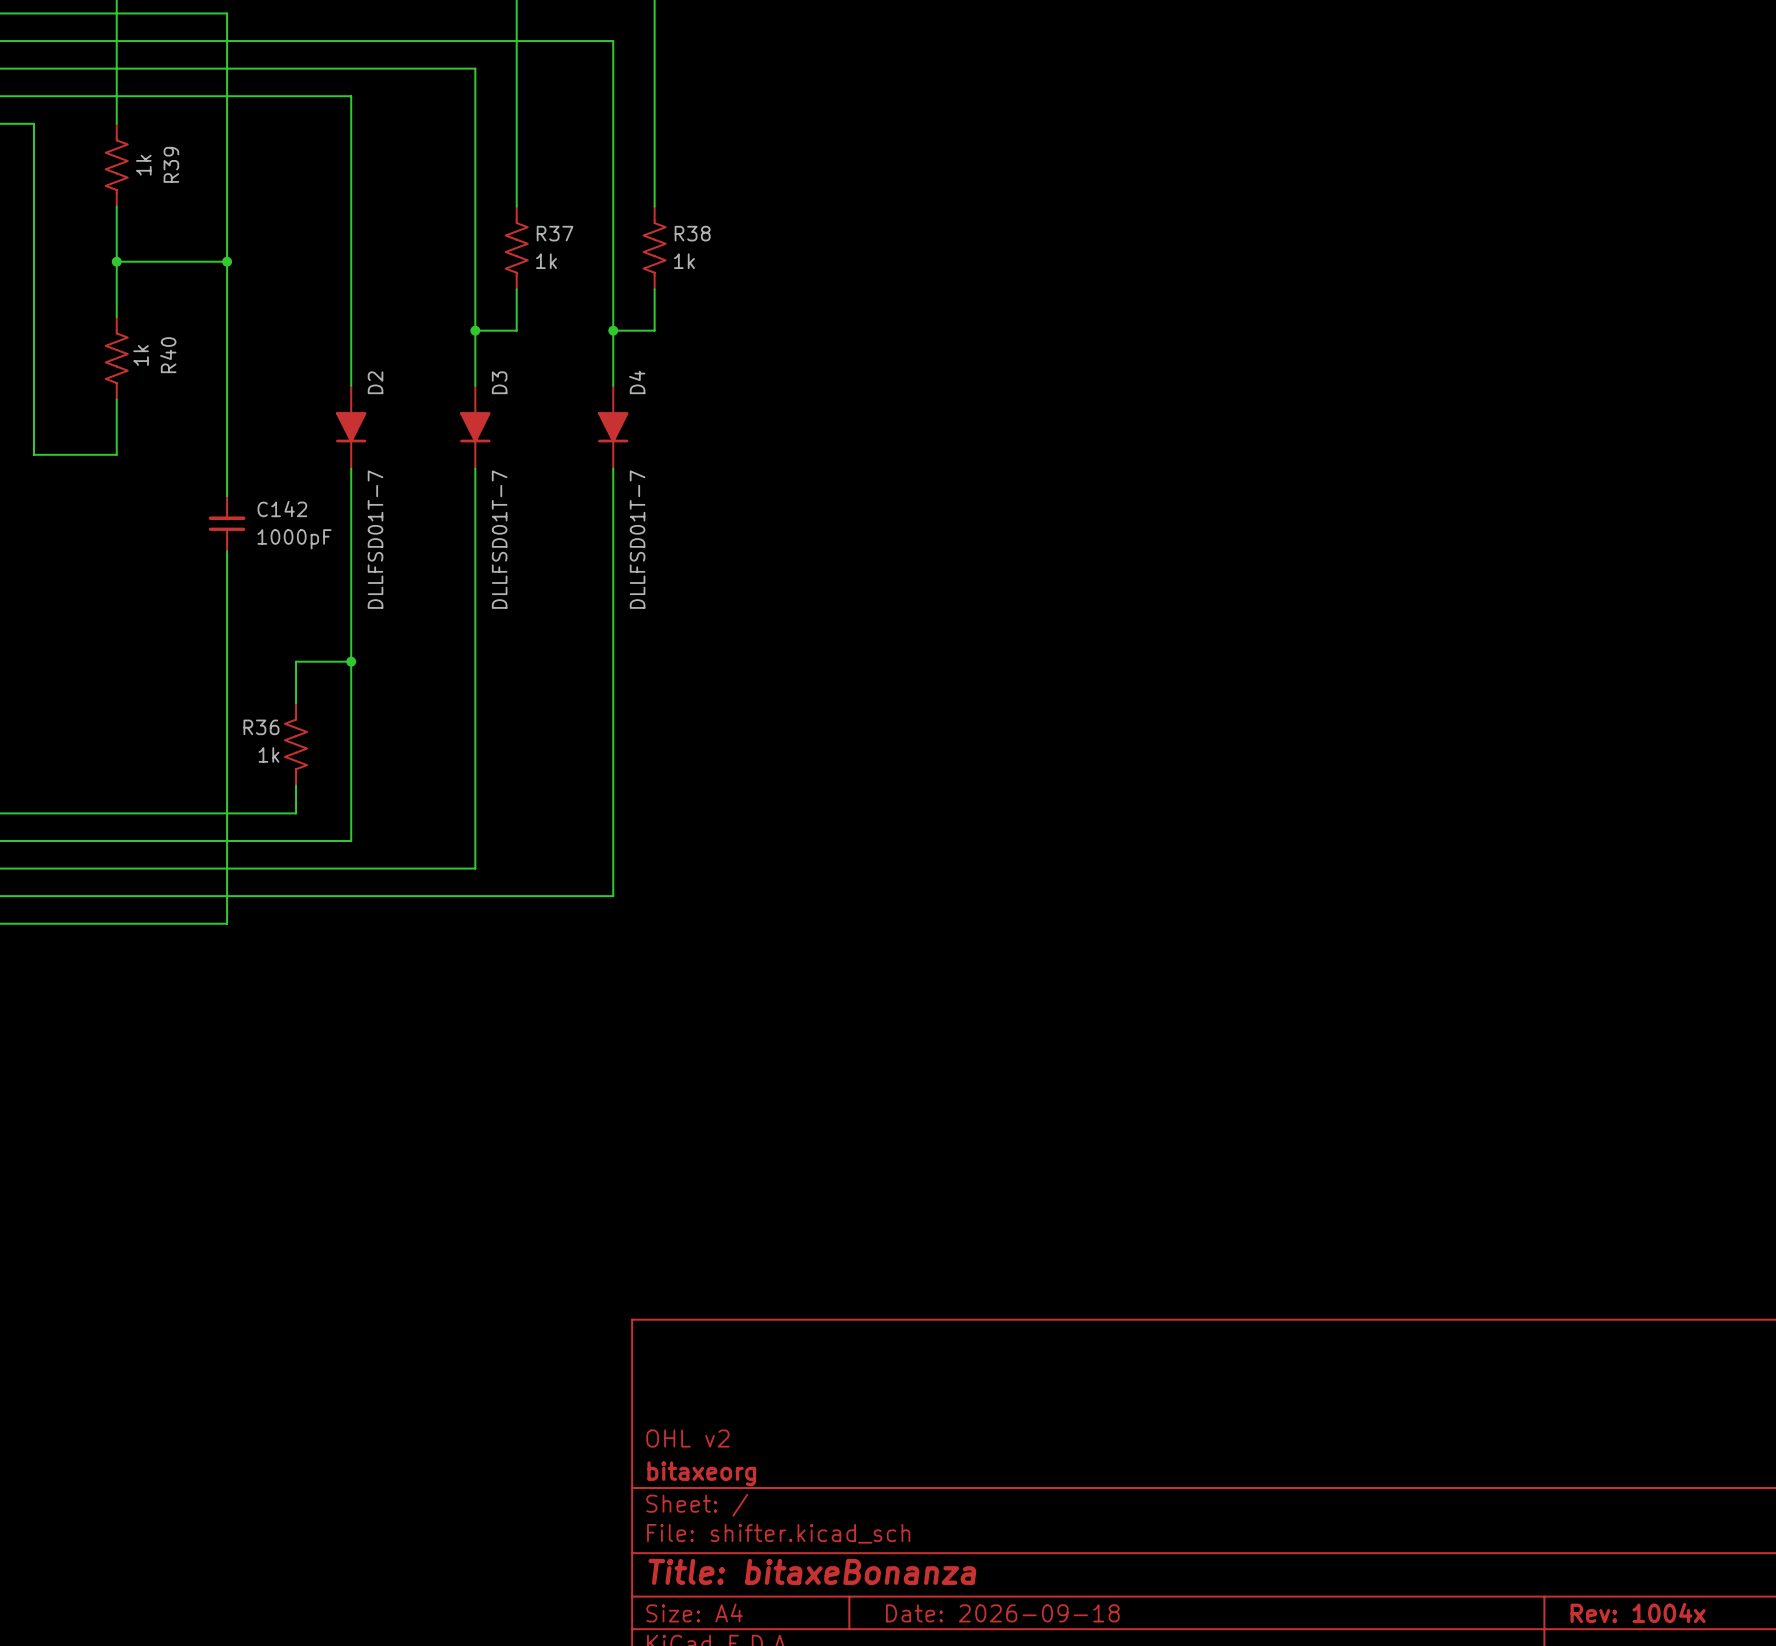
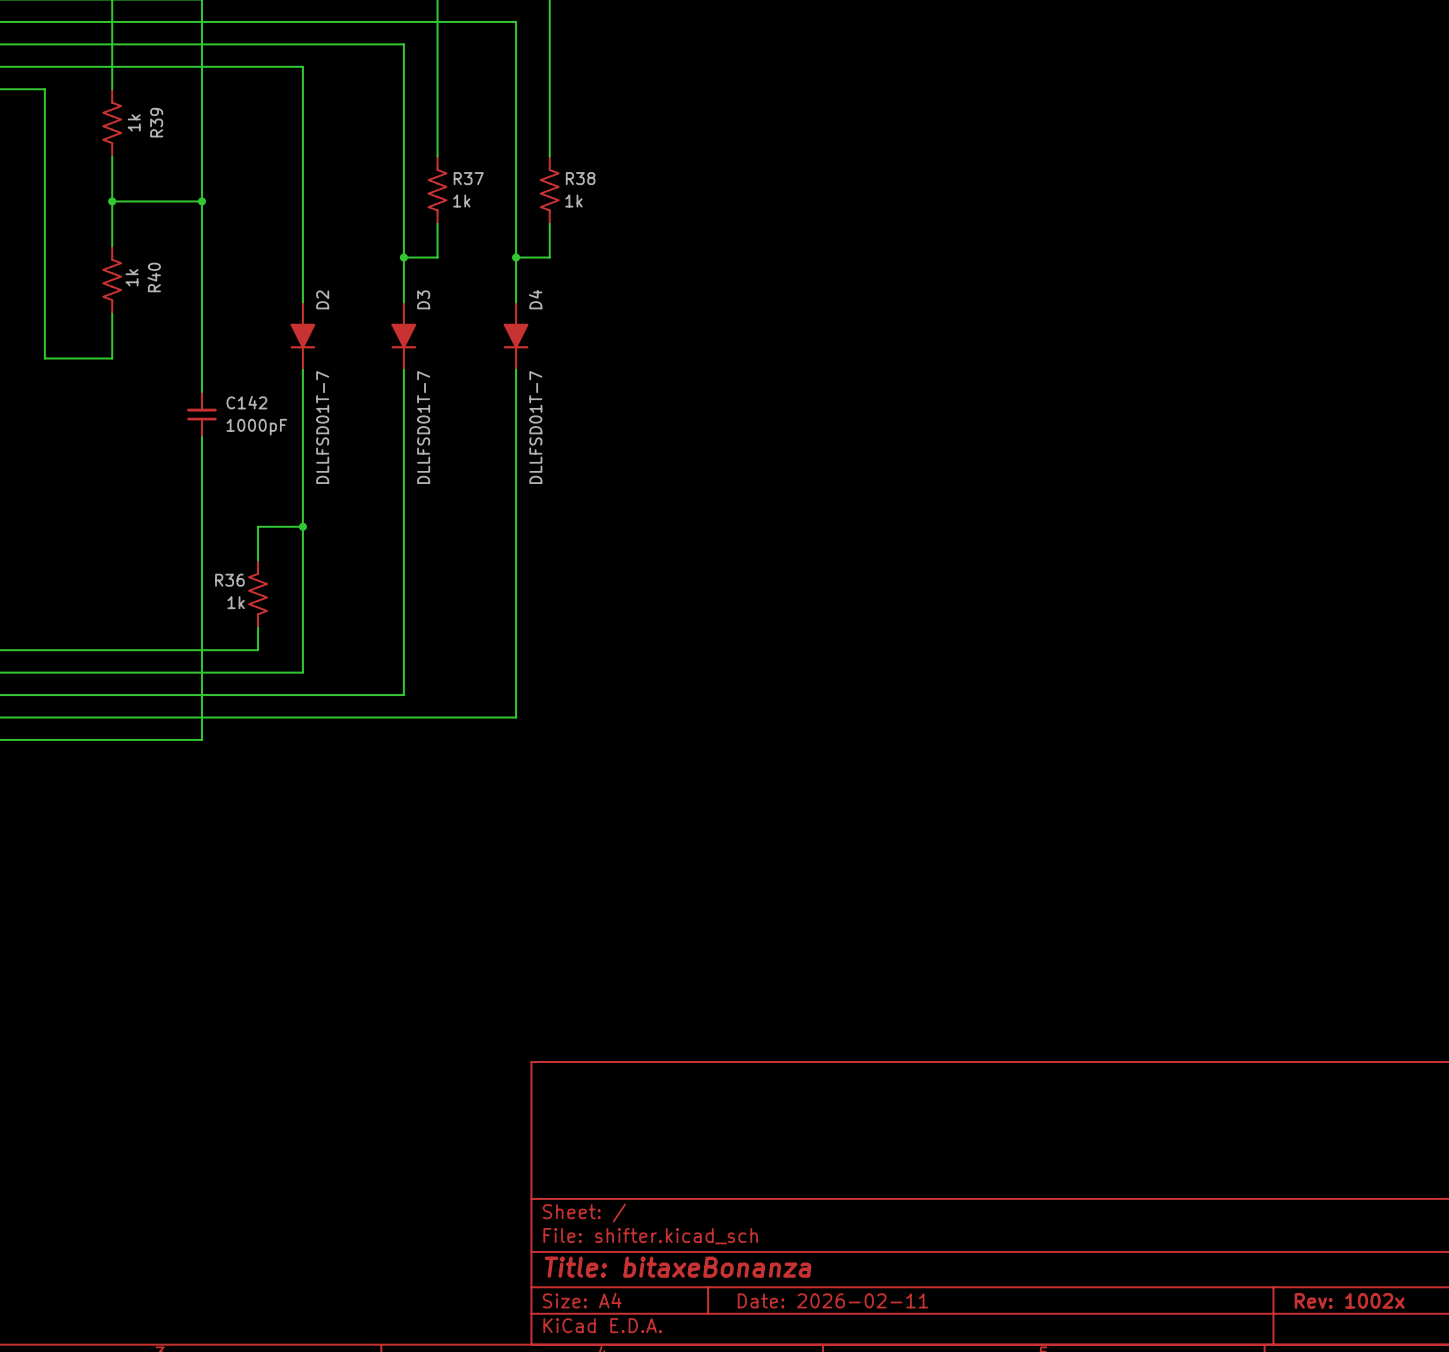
title block: OHL v2 (687, 1438) -> none
title block: bitaxeorg (701, 1473) -> none
title block: Rev: 1004x (1638, 1612) -> Rev: 1002x (1349, 1300)
title block: Date: 2026-09-18 (1002, 1613) -> Date: 2026-02-11 (832, 1300)

